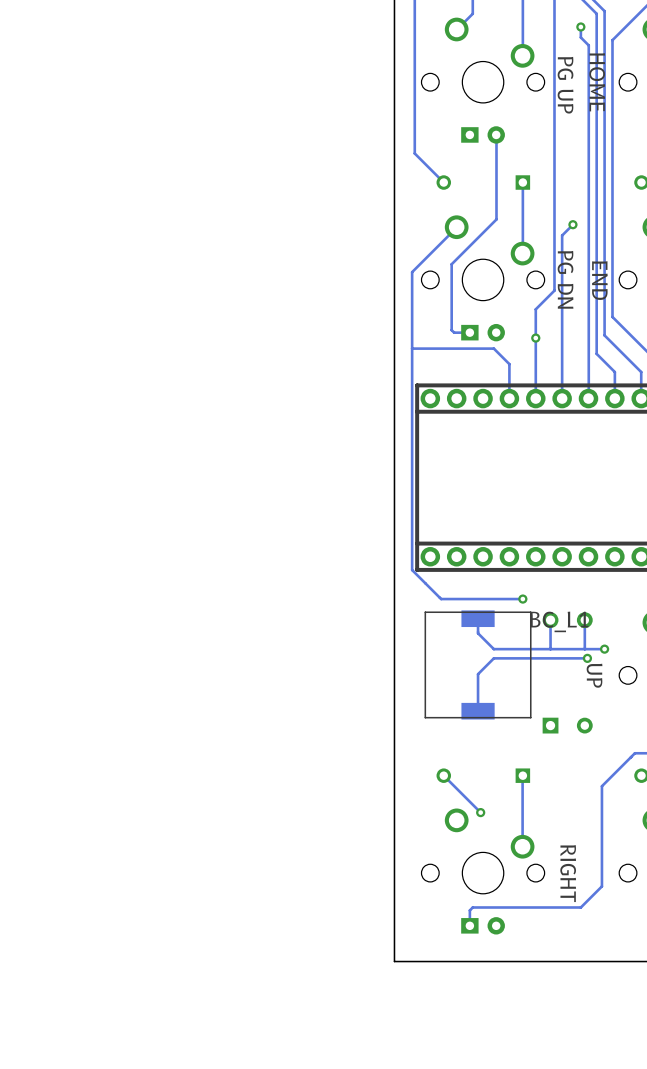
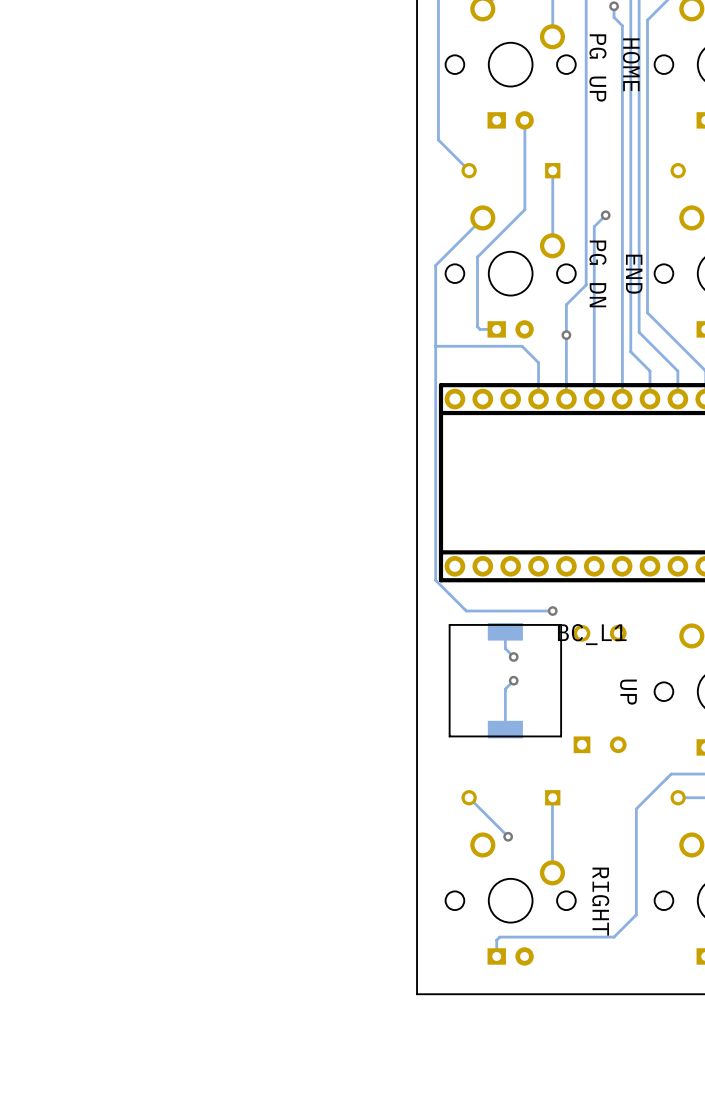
track: (550, 620) (550, 649) -> none
track: (584, 620) (584, 649) -> none
track: (478, 633) (493, 649) (604, 649) -> (505, 647) (513, 657)
via: none -> (513, 657)
via: (604, 649) -> none
track: (587, 658) (493, 658) (478, 674) -> (513, 680) (505, 690)
via: (587, 658) -> none
via: none -> (513, 680)

